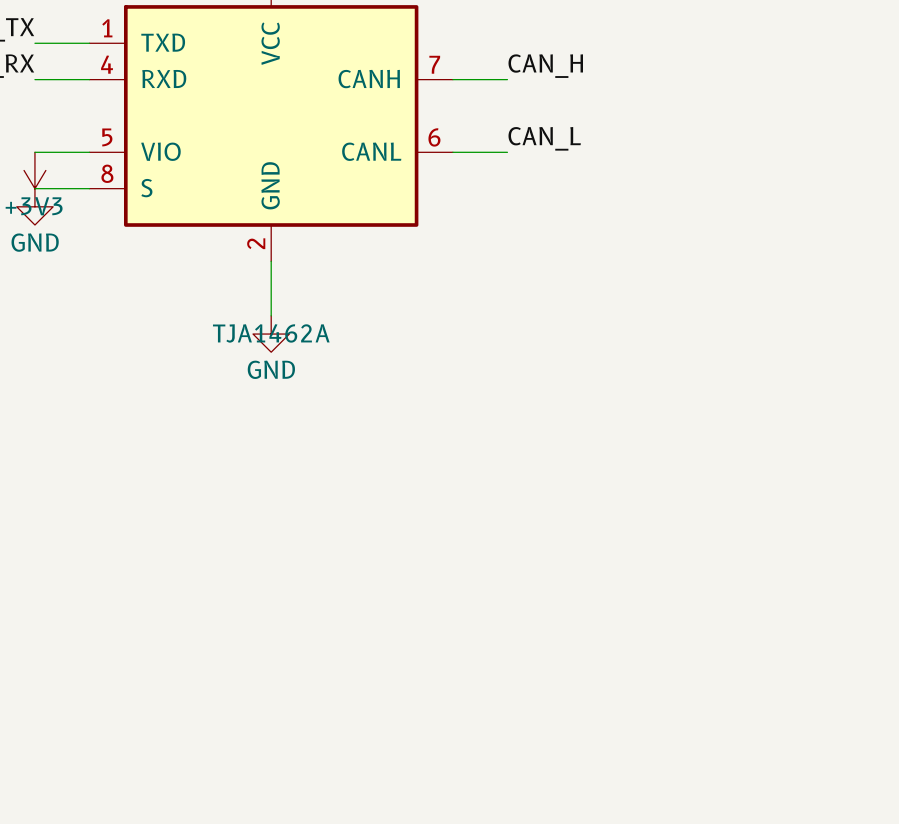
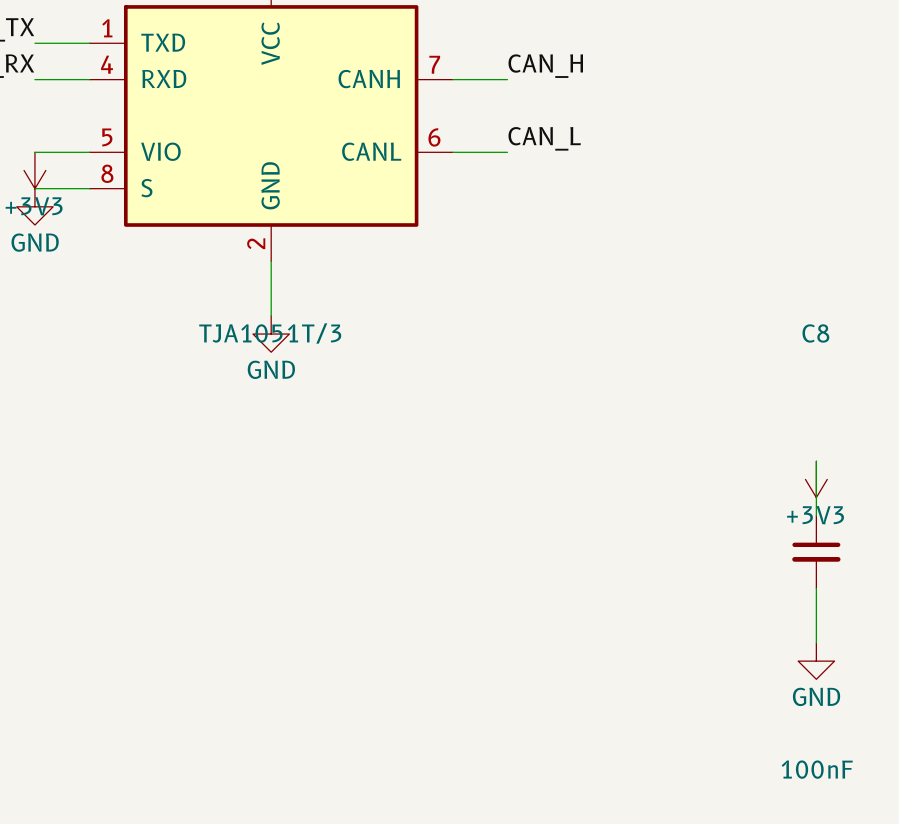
part value: TJA1462A (271, 333) -> TJA1051T/3 (270, 333)
wire: none -> (816, 461) (816, 515)
power symbol: none -> +3V3 (816, 479)
C8: none -> 100nF (816, 552)
wire: none -> (816, 588) (816, 642)
power symbol: none -> GND (816, 661)

